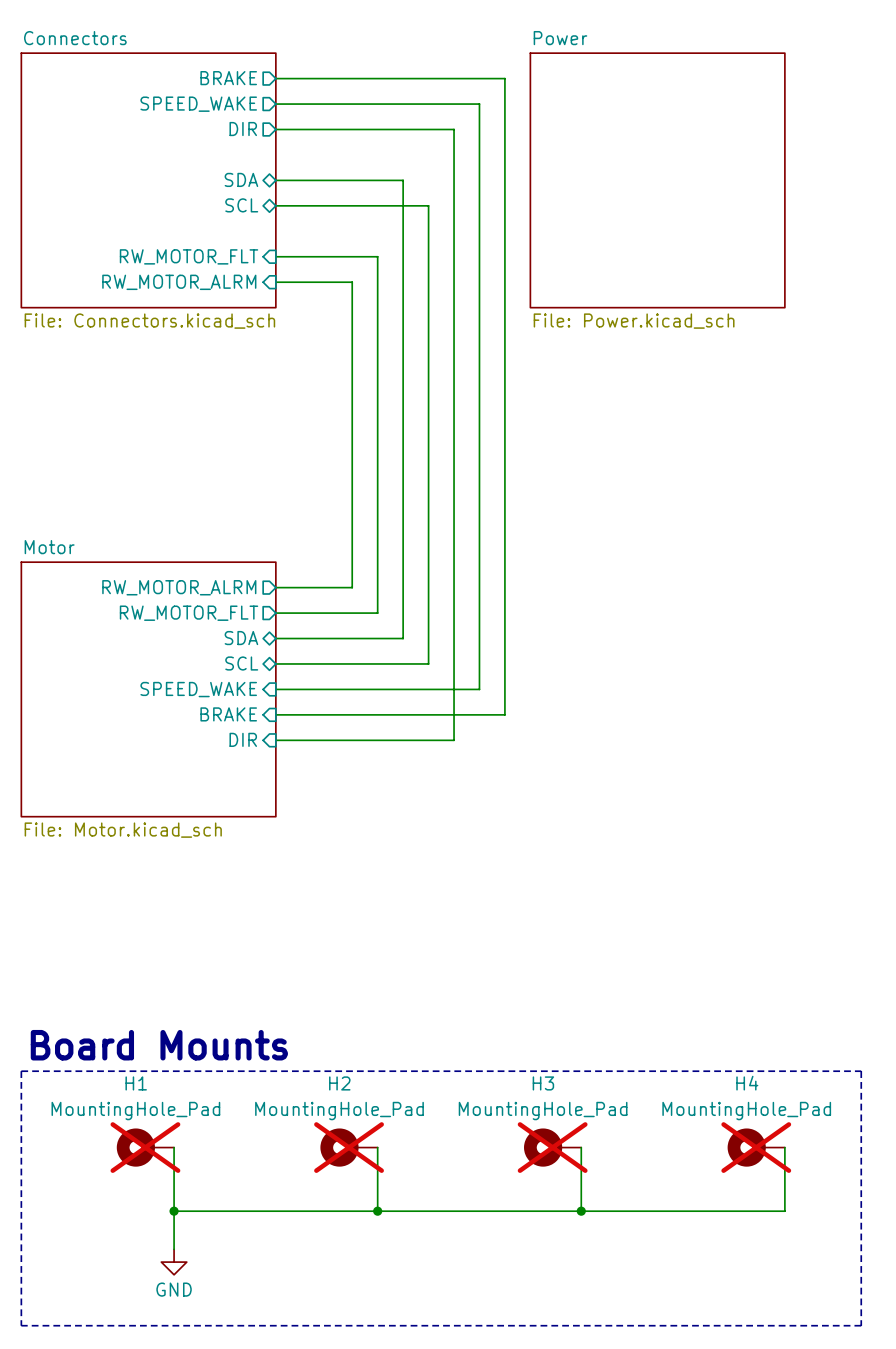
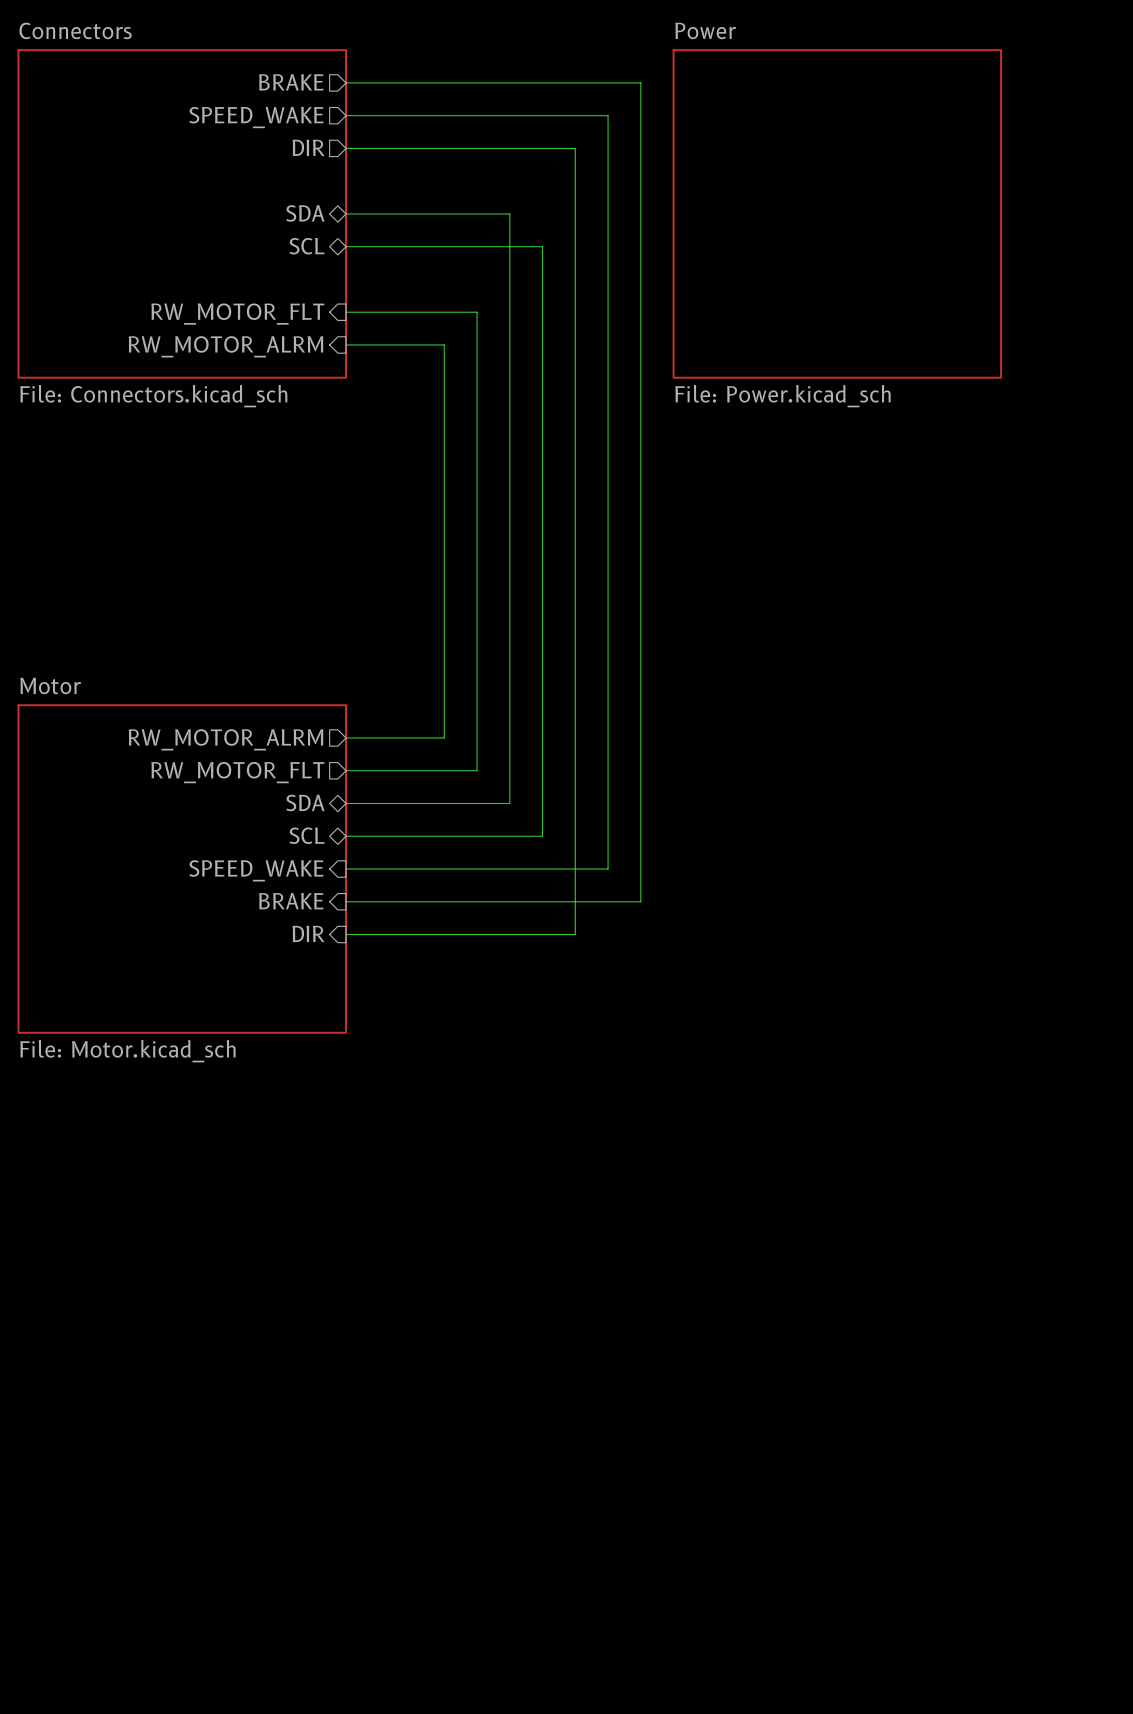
text: Board Mounts (159, 1045) -> none
line: (21, 1071) (21, 1325) (861, 1325) (861, 1071) (21, 1071) -> none
H1: MountingHole_Pad (145, 1147) -> none
wire: (174, 1147) (174, 1249) -> none
H2: MountingHole_Pad (349, 1147) -> none
wire: (377, 1147) (377, 1211) -> none
H3: MountingHole_Pad (552, 1147) -> none
wire: (581, 1147) (581, 1211) -> none
H4: MountingHole_Pad (756, 1147) -> none
wire: (784, 1147) (784, 1211) (174, 1211) -> none
junction: (174, 1211) -> none
junction: (377, 1211) -> none
junction: (581, 1211) -> none
power symbol: GND (174, 1262) -> none

